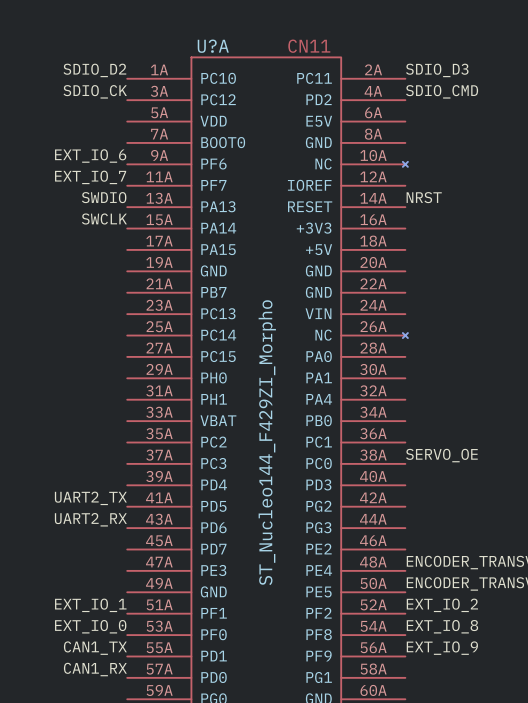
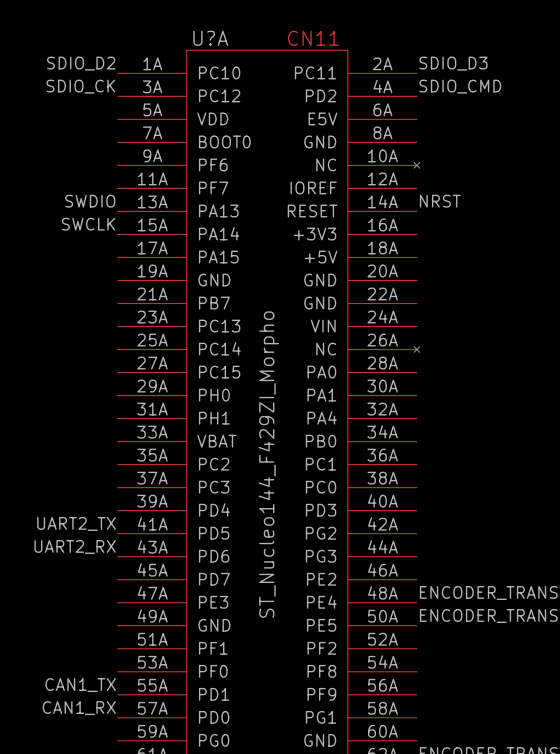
label: EXT_IO_6 (90, 156) -> none
label: EXT_IO_7 (90, 177) -> none
label: SERVO_OE (441, 455) -> none
label: EXT_IO_1 (90, 605) -> none
label: EXT_IO_2 (442, 605) -> none
label: EXT_IO_0 (90, 626) -> none
label: EXT_IO_8 (442, 626) -> none
label: EXT_IO_9 (442, 648) -> none

